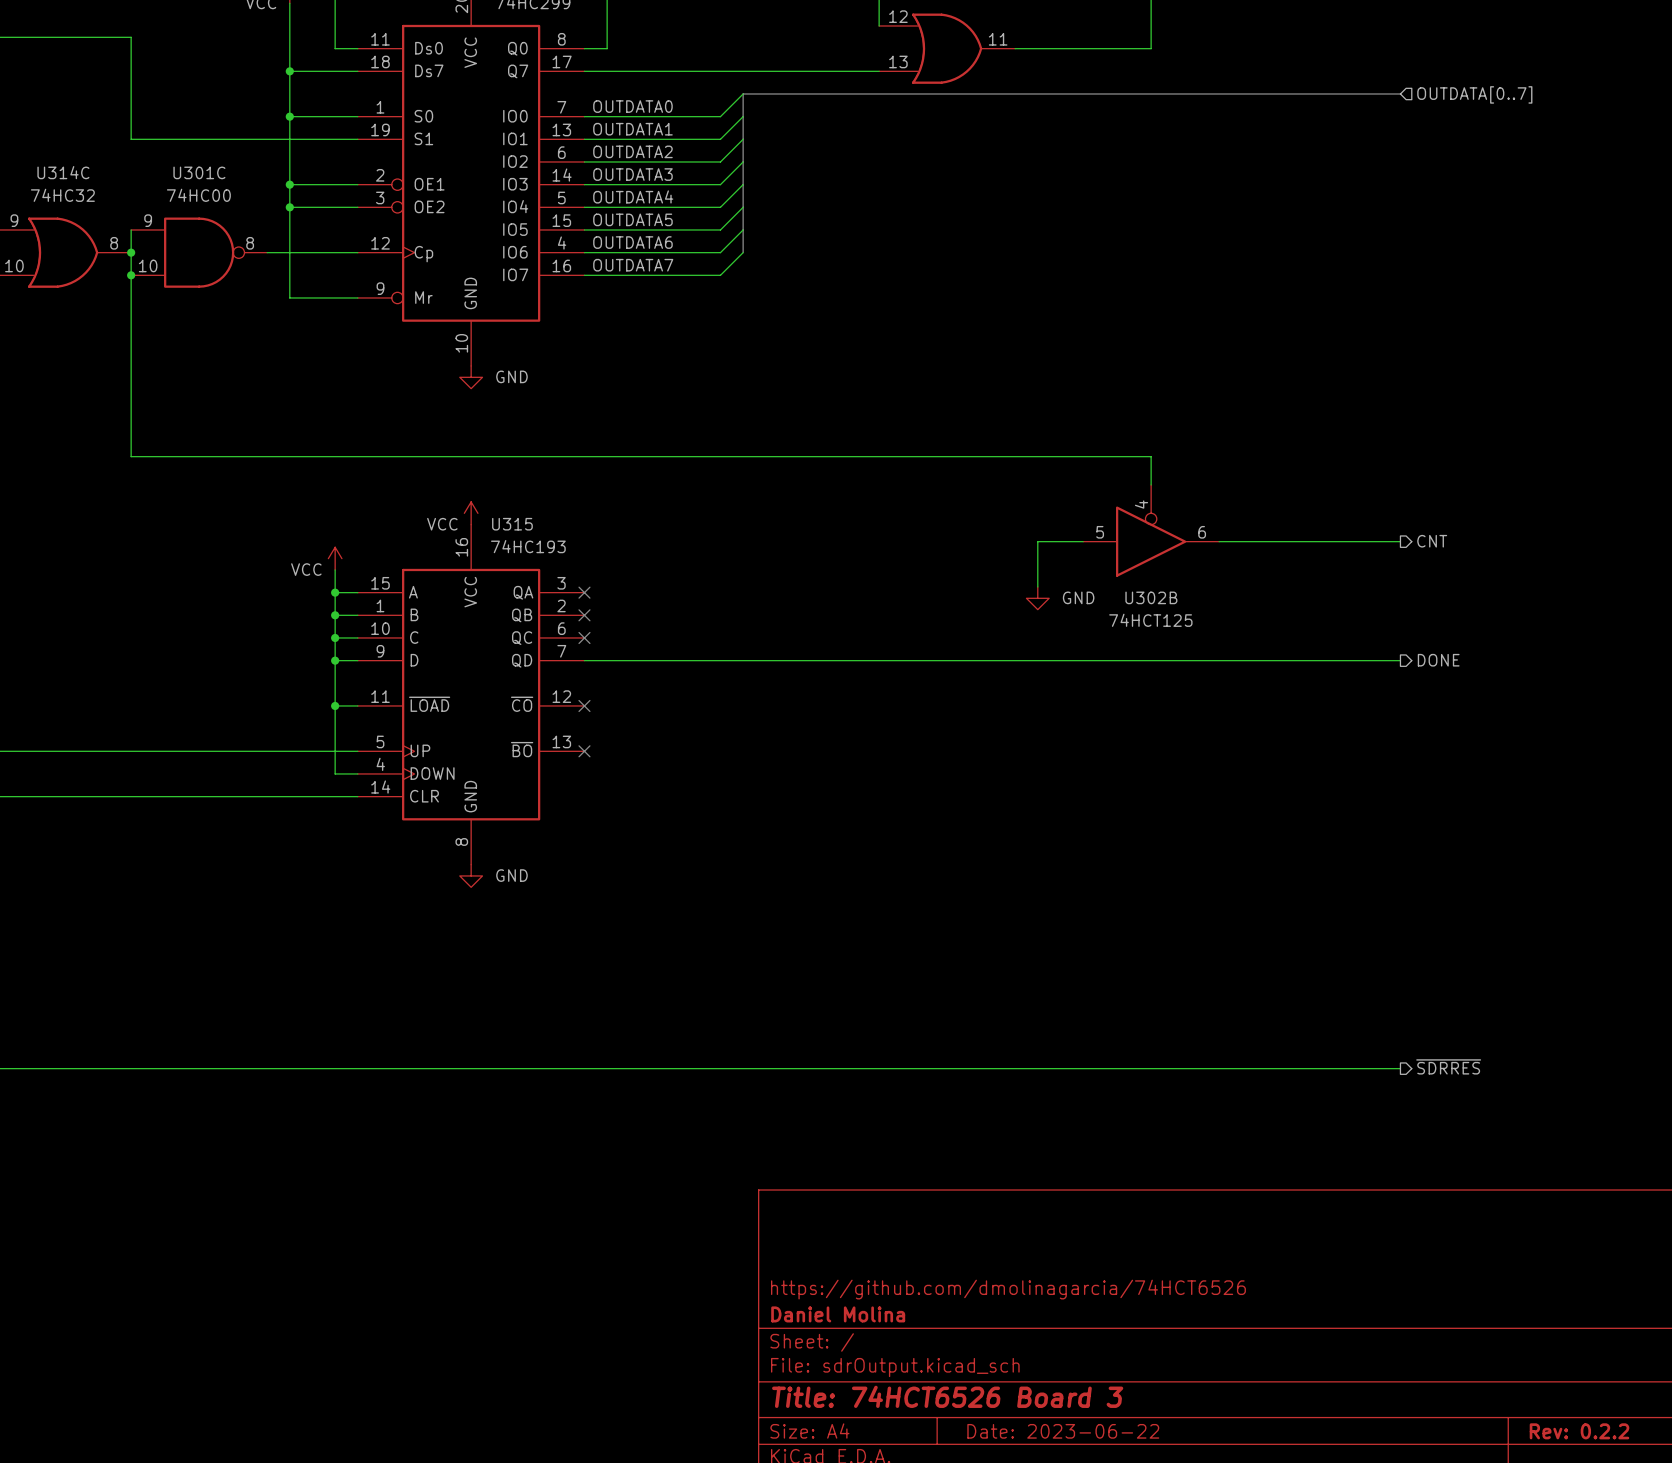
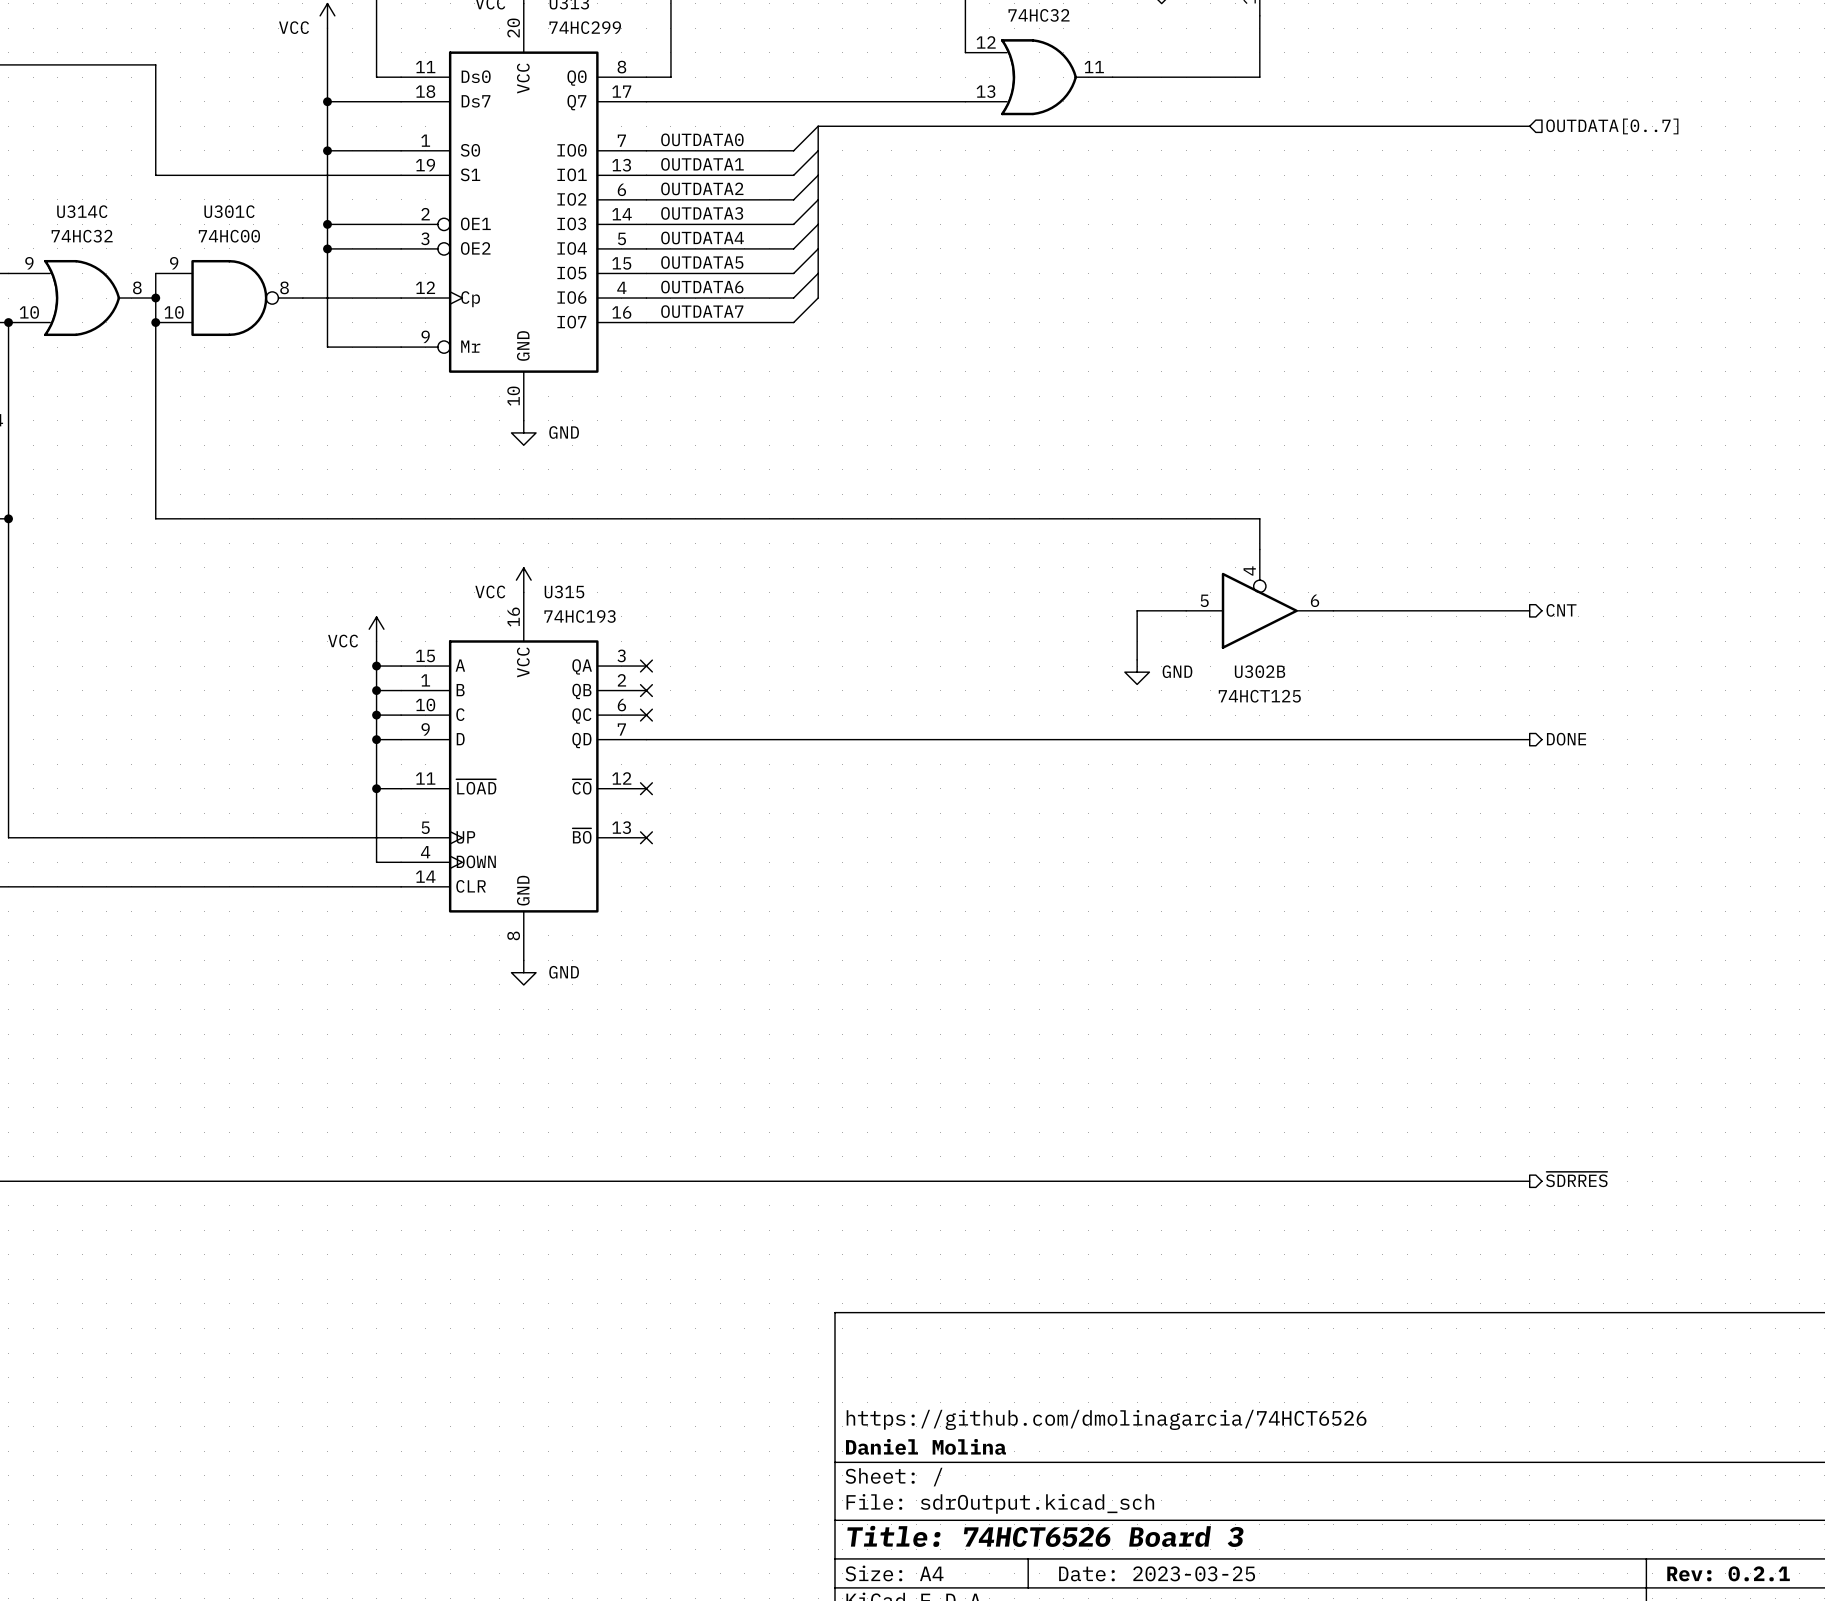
title block: Date: 2023-06-22 (1063, 1431) -> Date: 2023-03-25 (1157, 1573)
title block: Rev: 0.2.2 (1579, 1431) -> Rev: 0.2.1 (1728, 1573)

